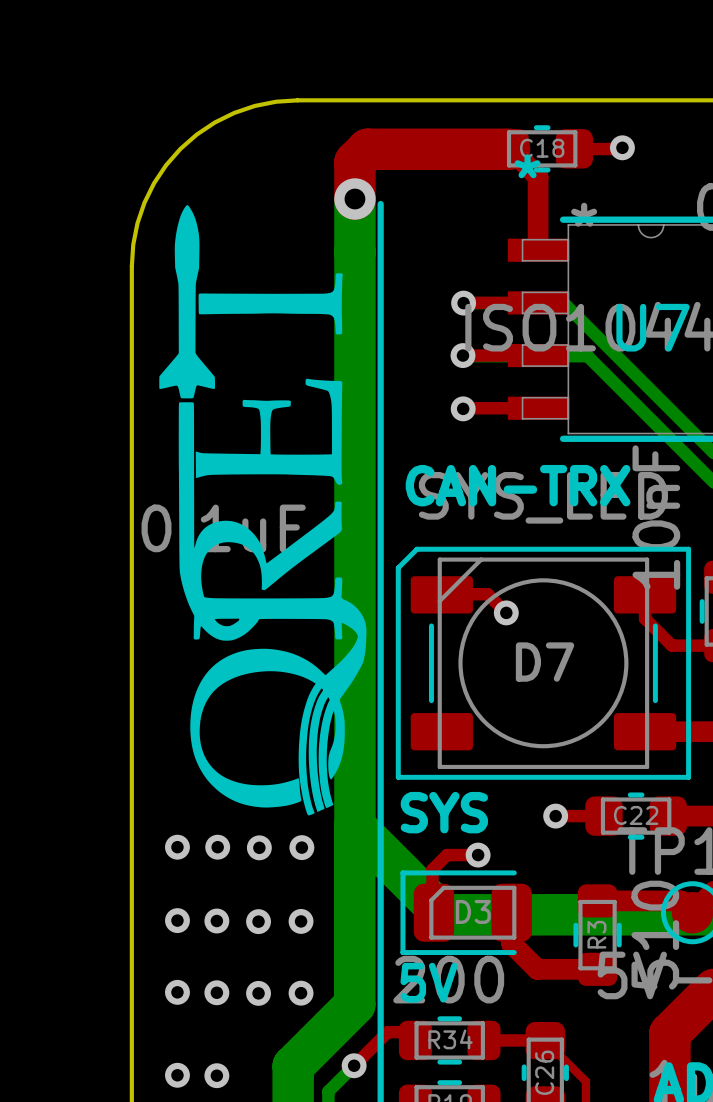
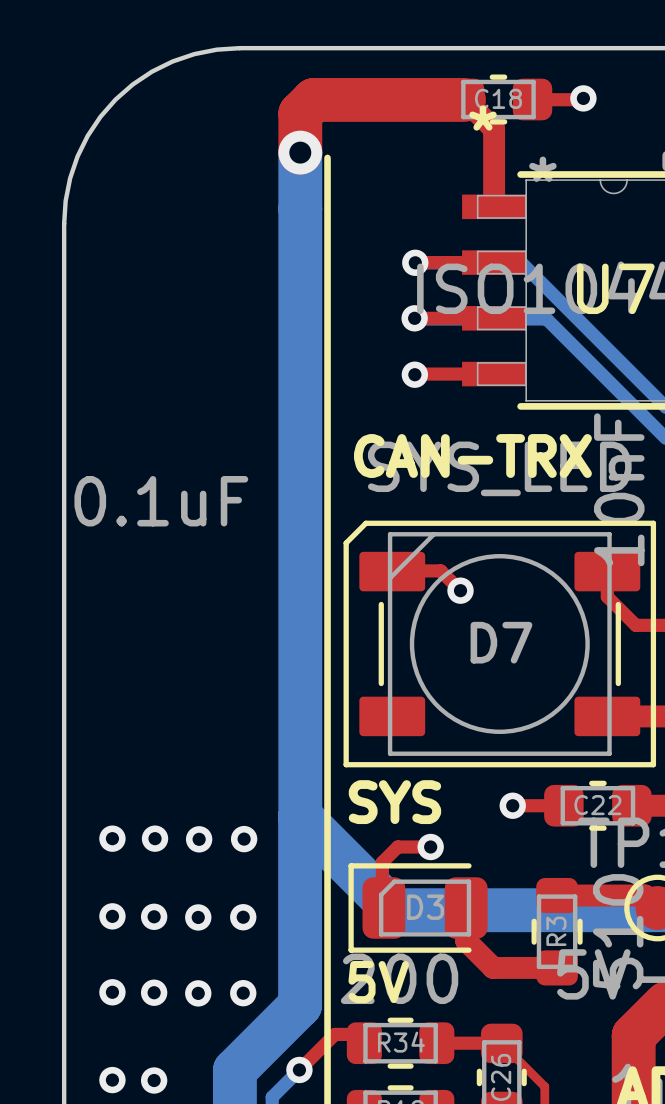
drawing: [159, 205, 367, 816] -> none

